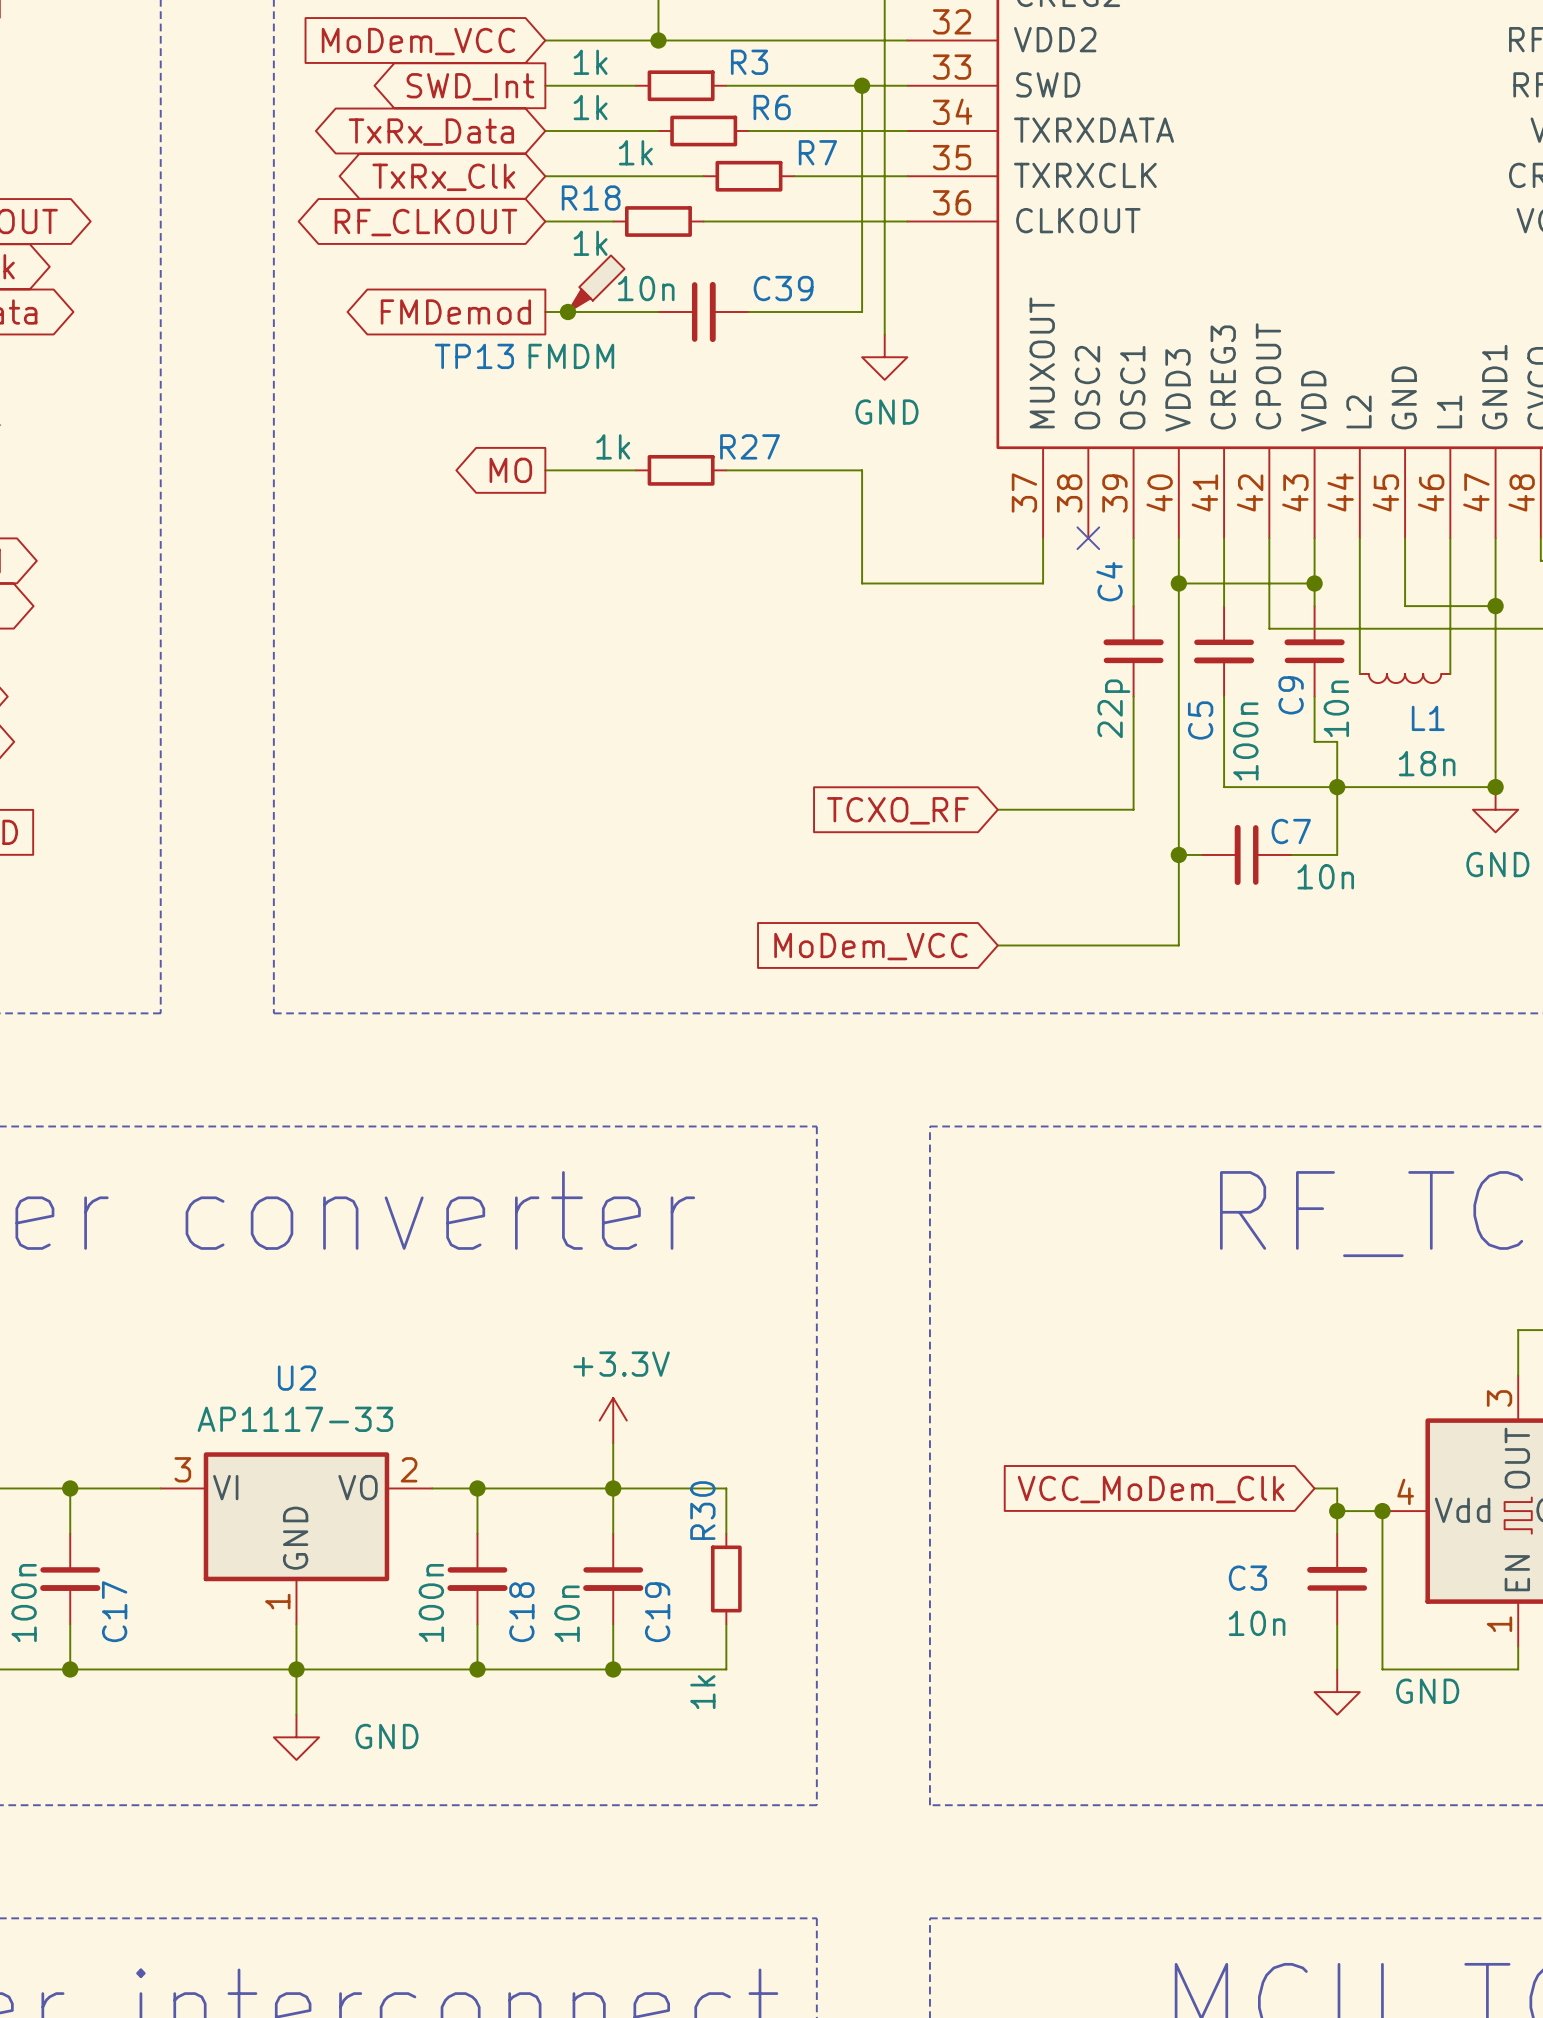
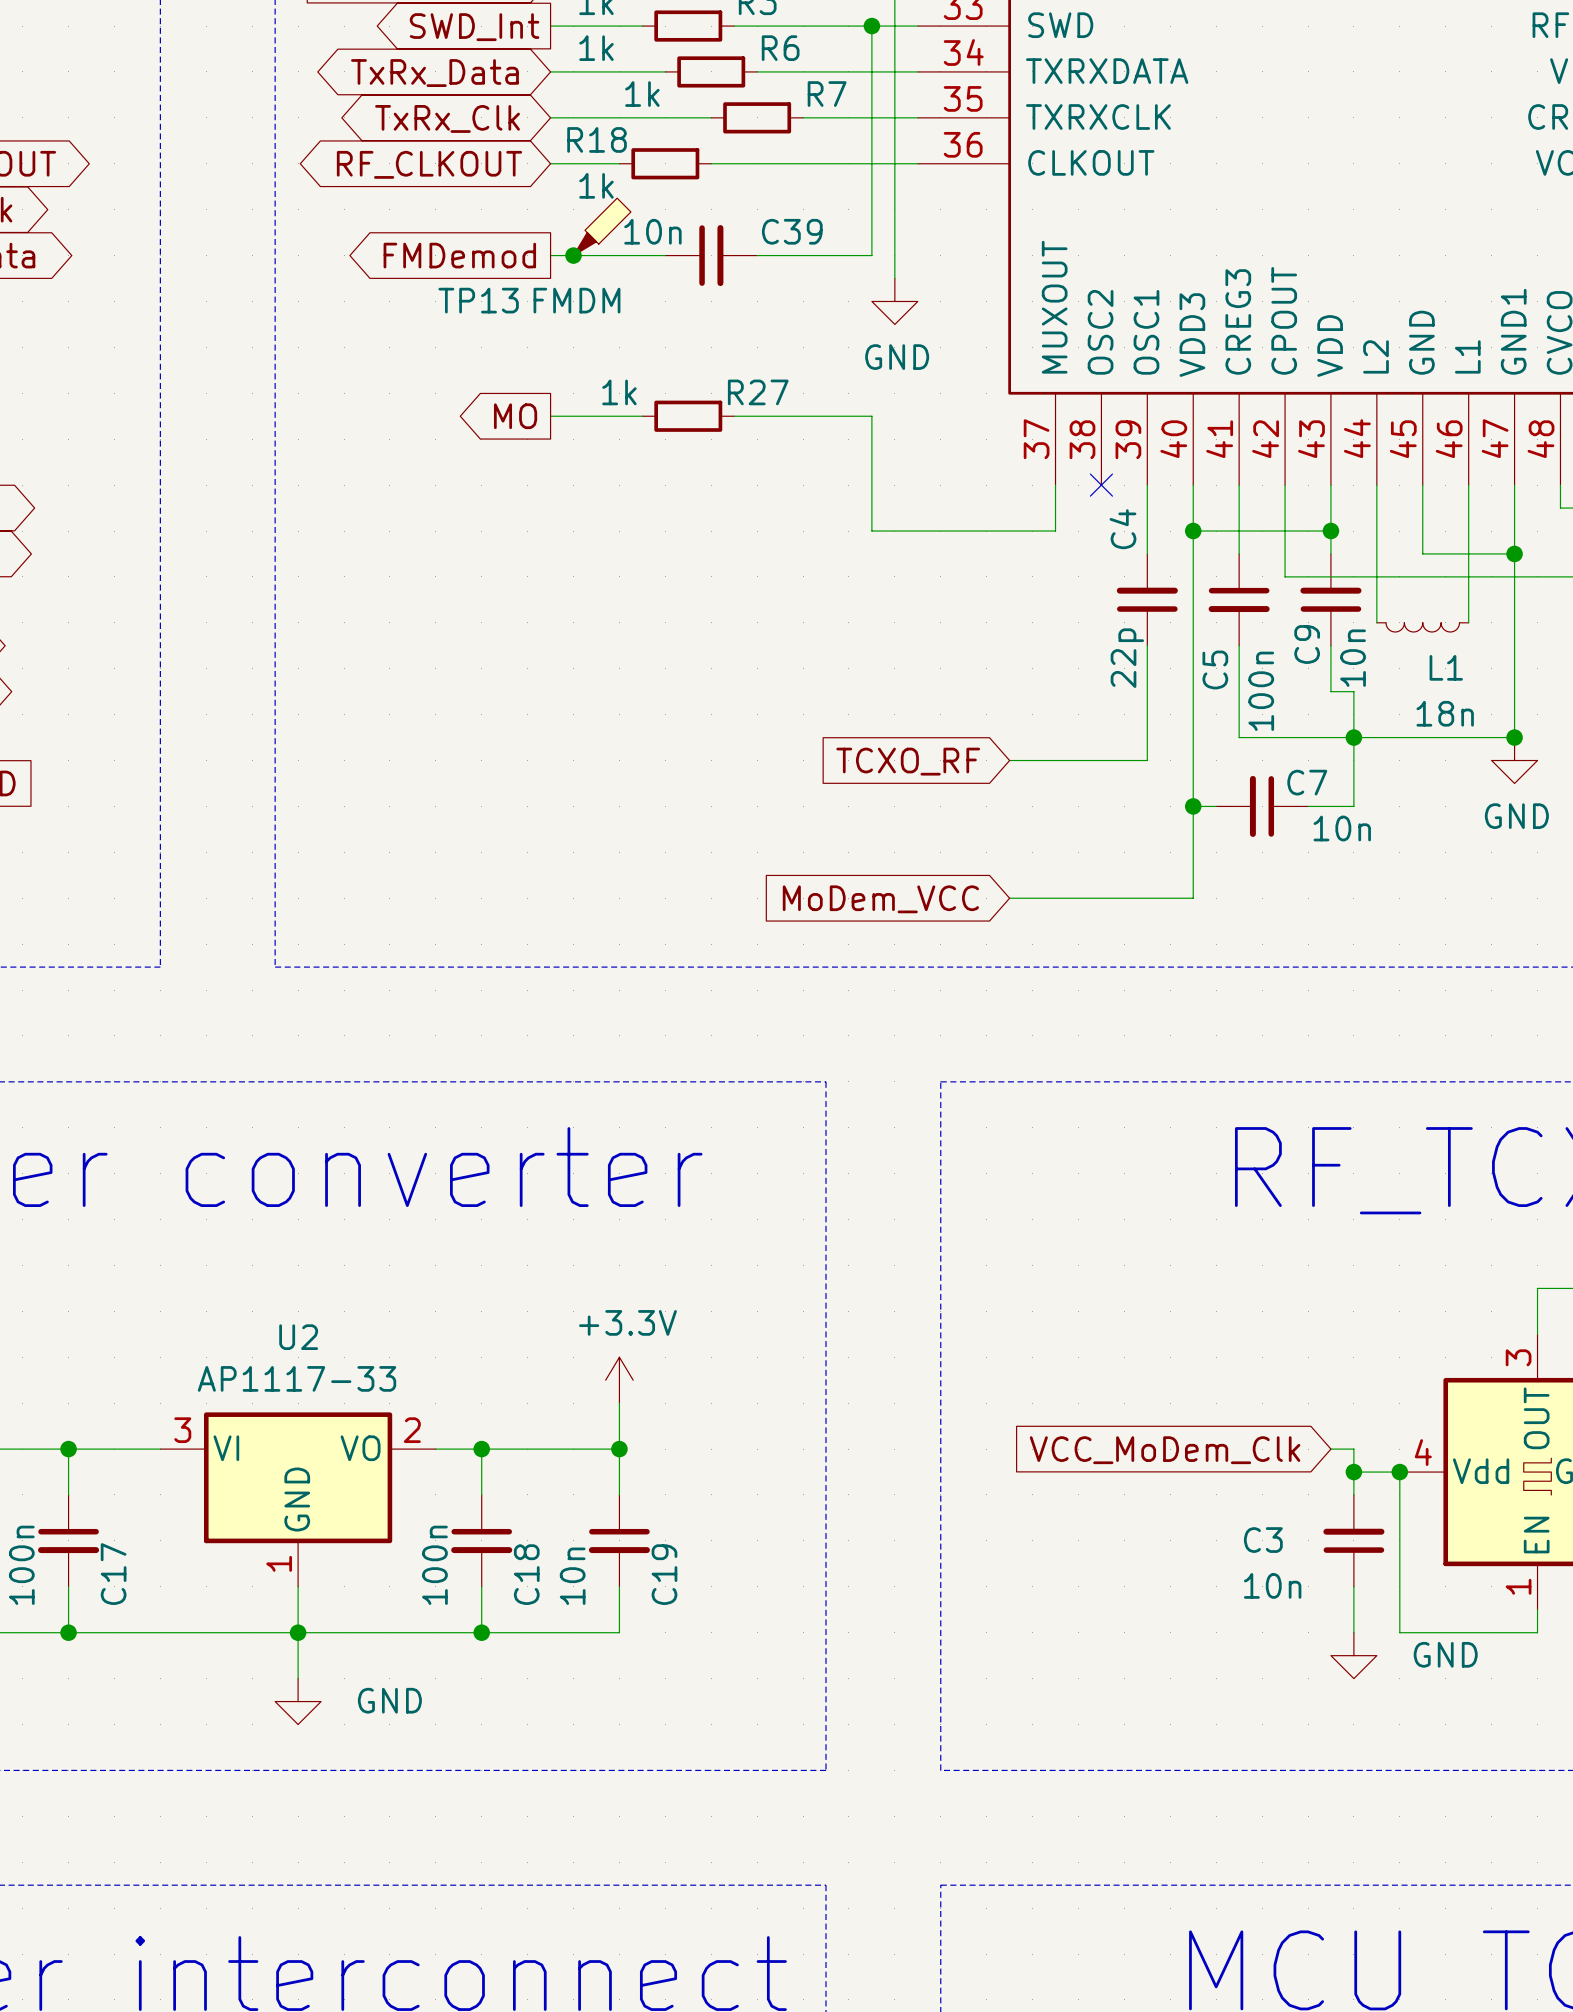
wire: (613, 1488) (726, 1488) (726, 1533) -> none
R30: 1k (726, 1578) -> none
wire: (726, 1624) (726, 1669) (613, 1669) -> none
junction: (613, 1669) -> none

